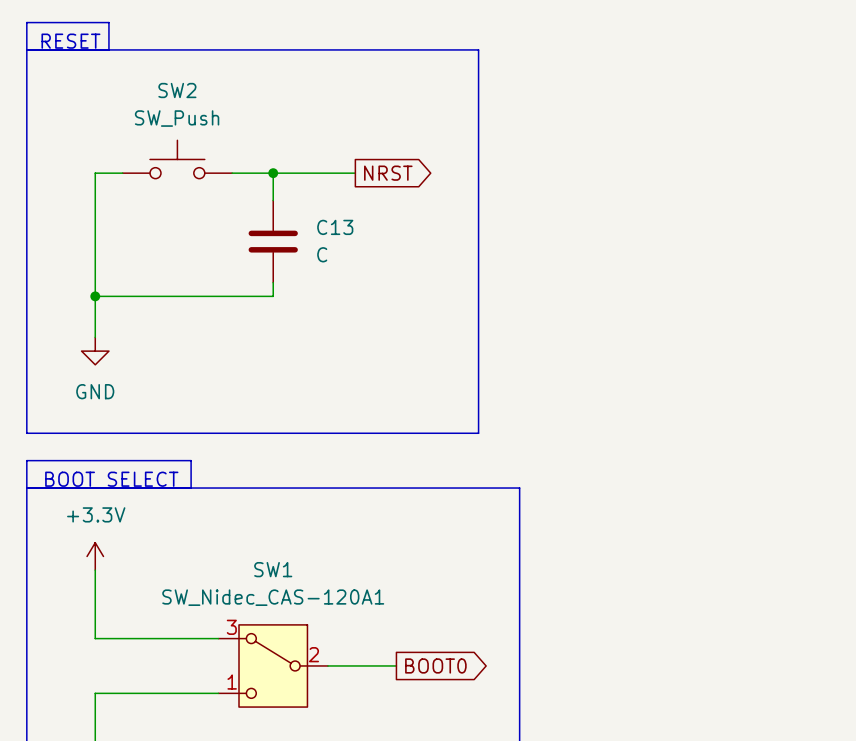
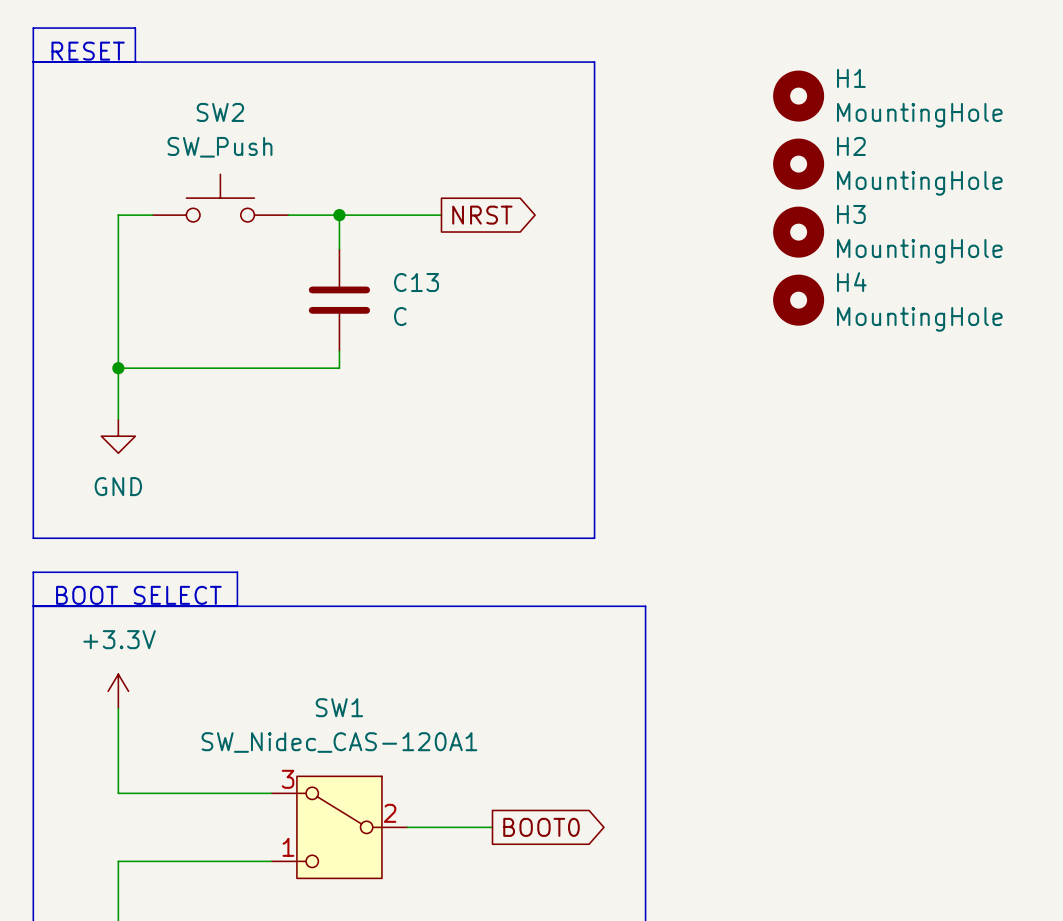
H1: none -> MountingHole (798, 96)
H2: none -> MountingHole (798, 164)
H3: none -> MountingHole (798, 232)
H4: none -> MountingHole (798, 300)

